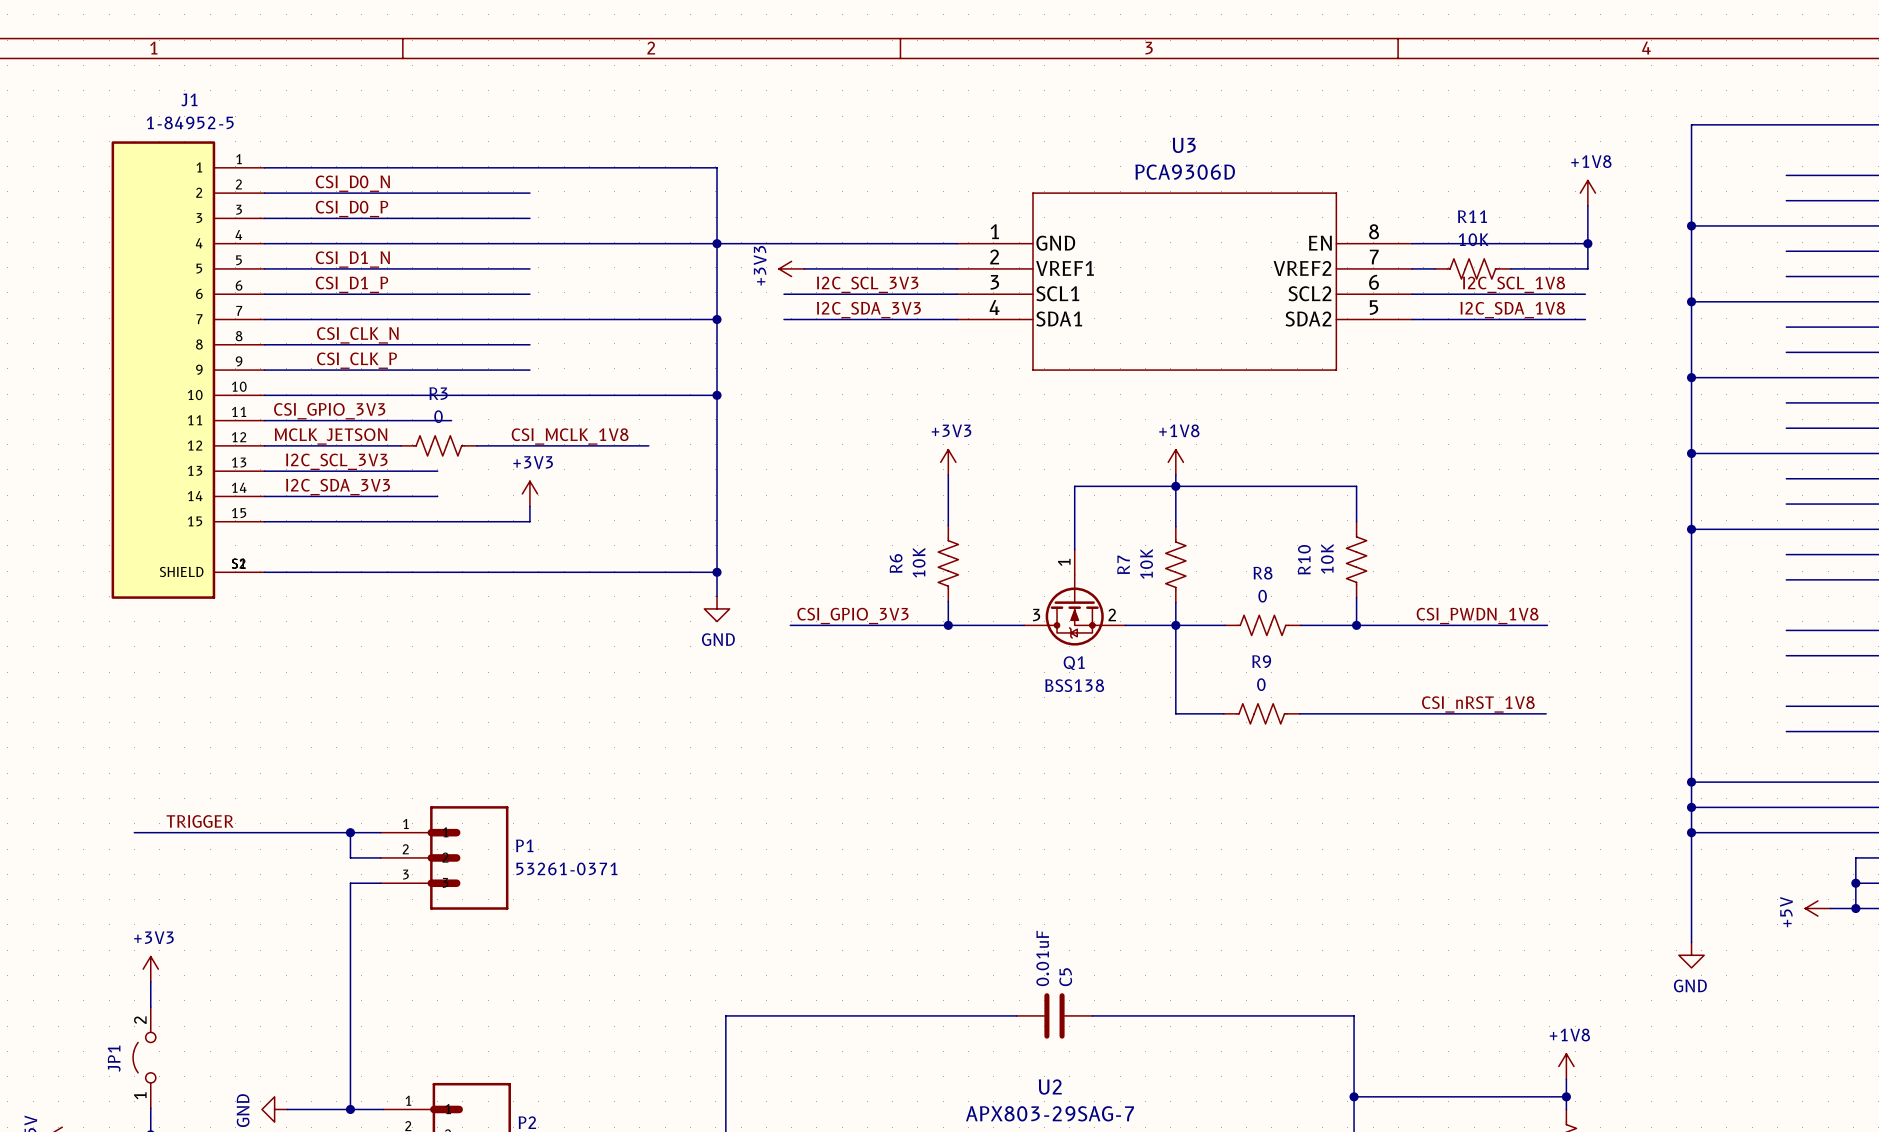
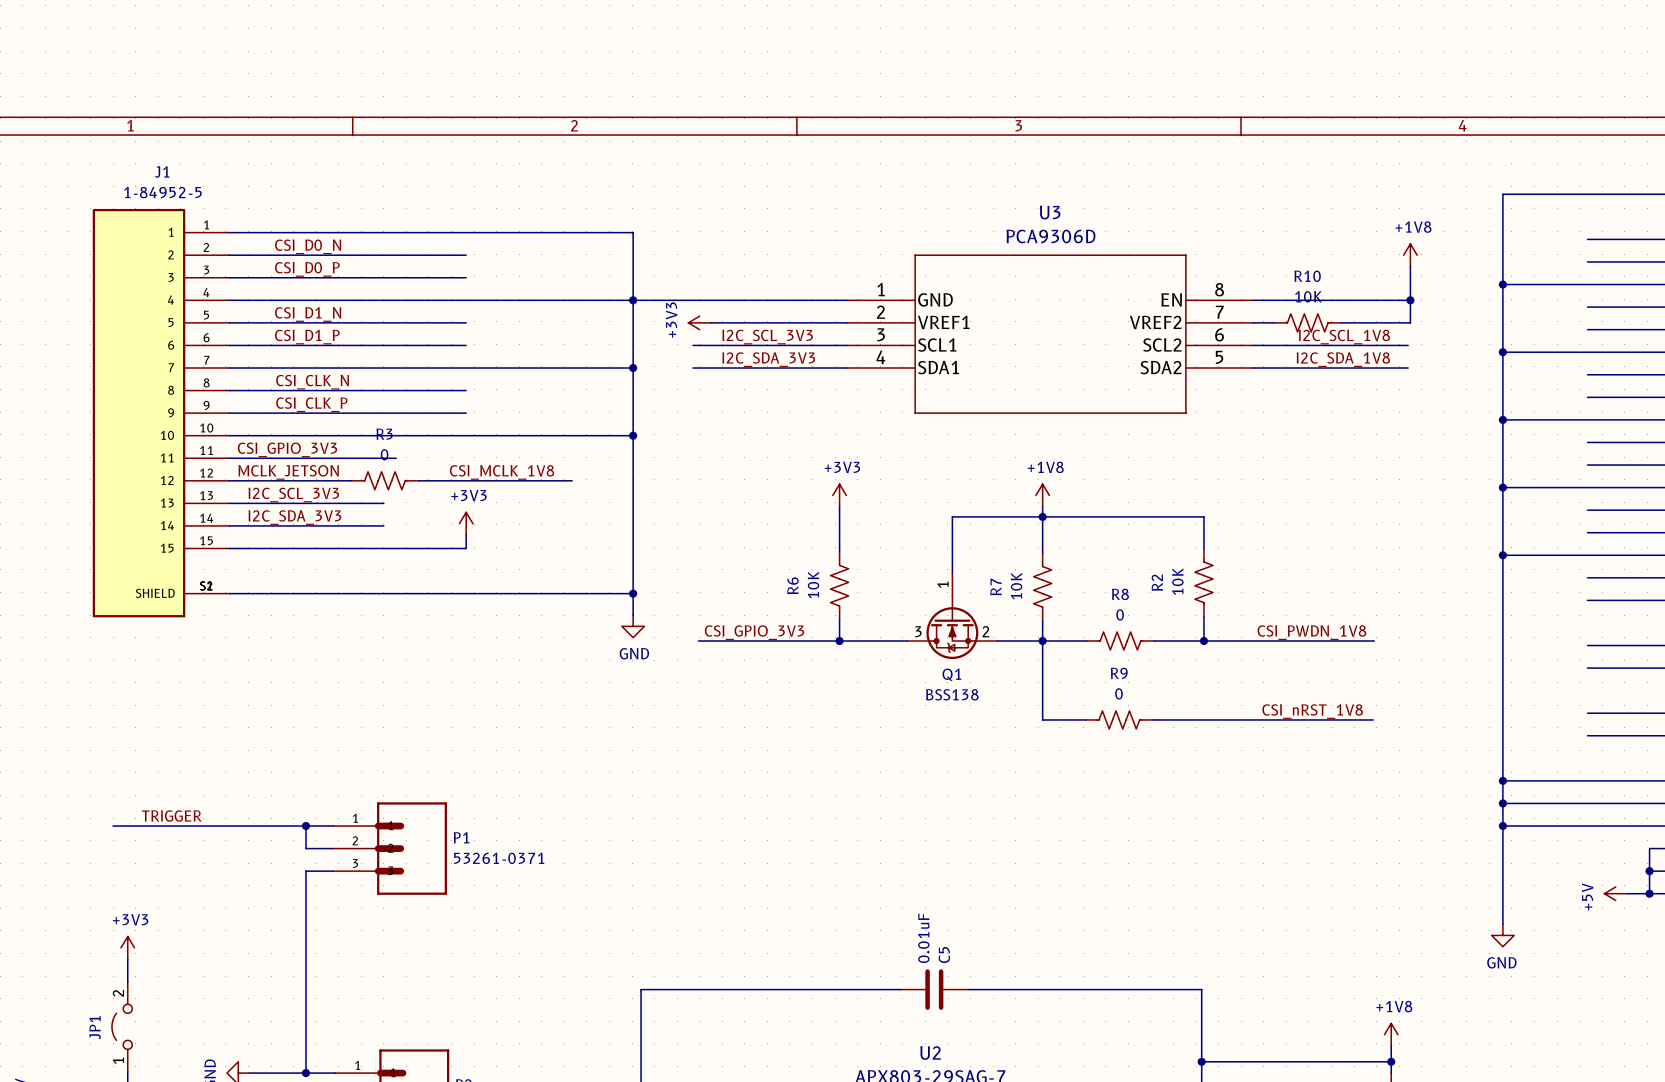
R11 name: R11 (1472, 216) -> R10 (1307, 276)
R10 name: R10 (1304, 559) -> R2 (1157, 582)

